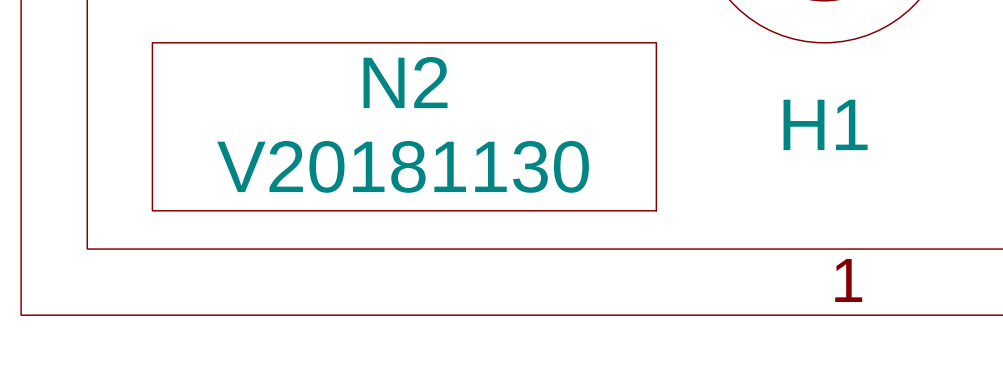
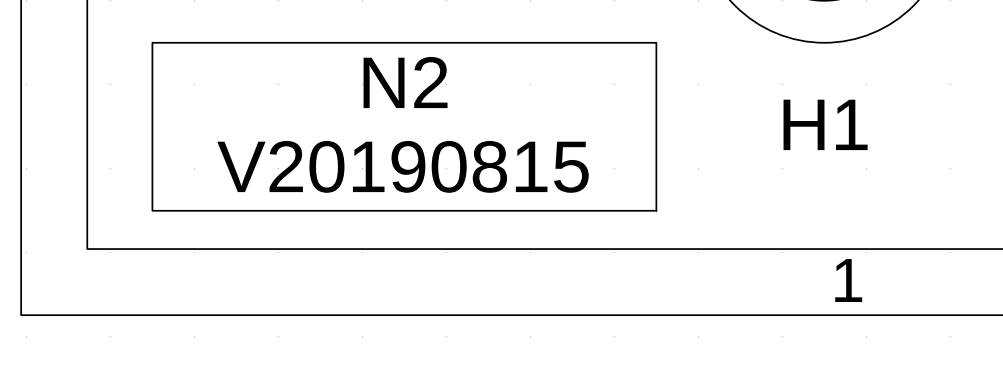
N2 value: V20181130 (403, 166) -> V20190815 (403, 166)

